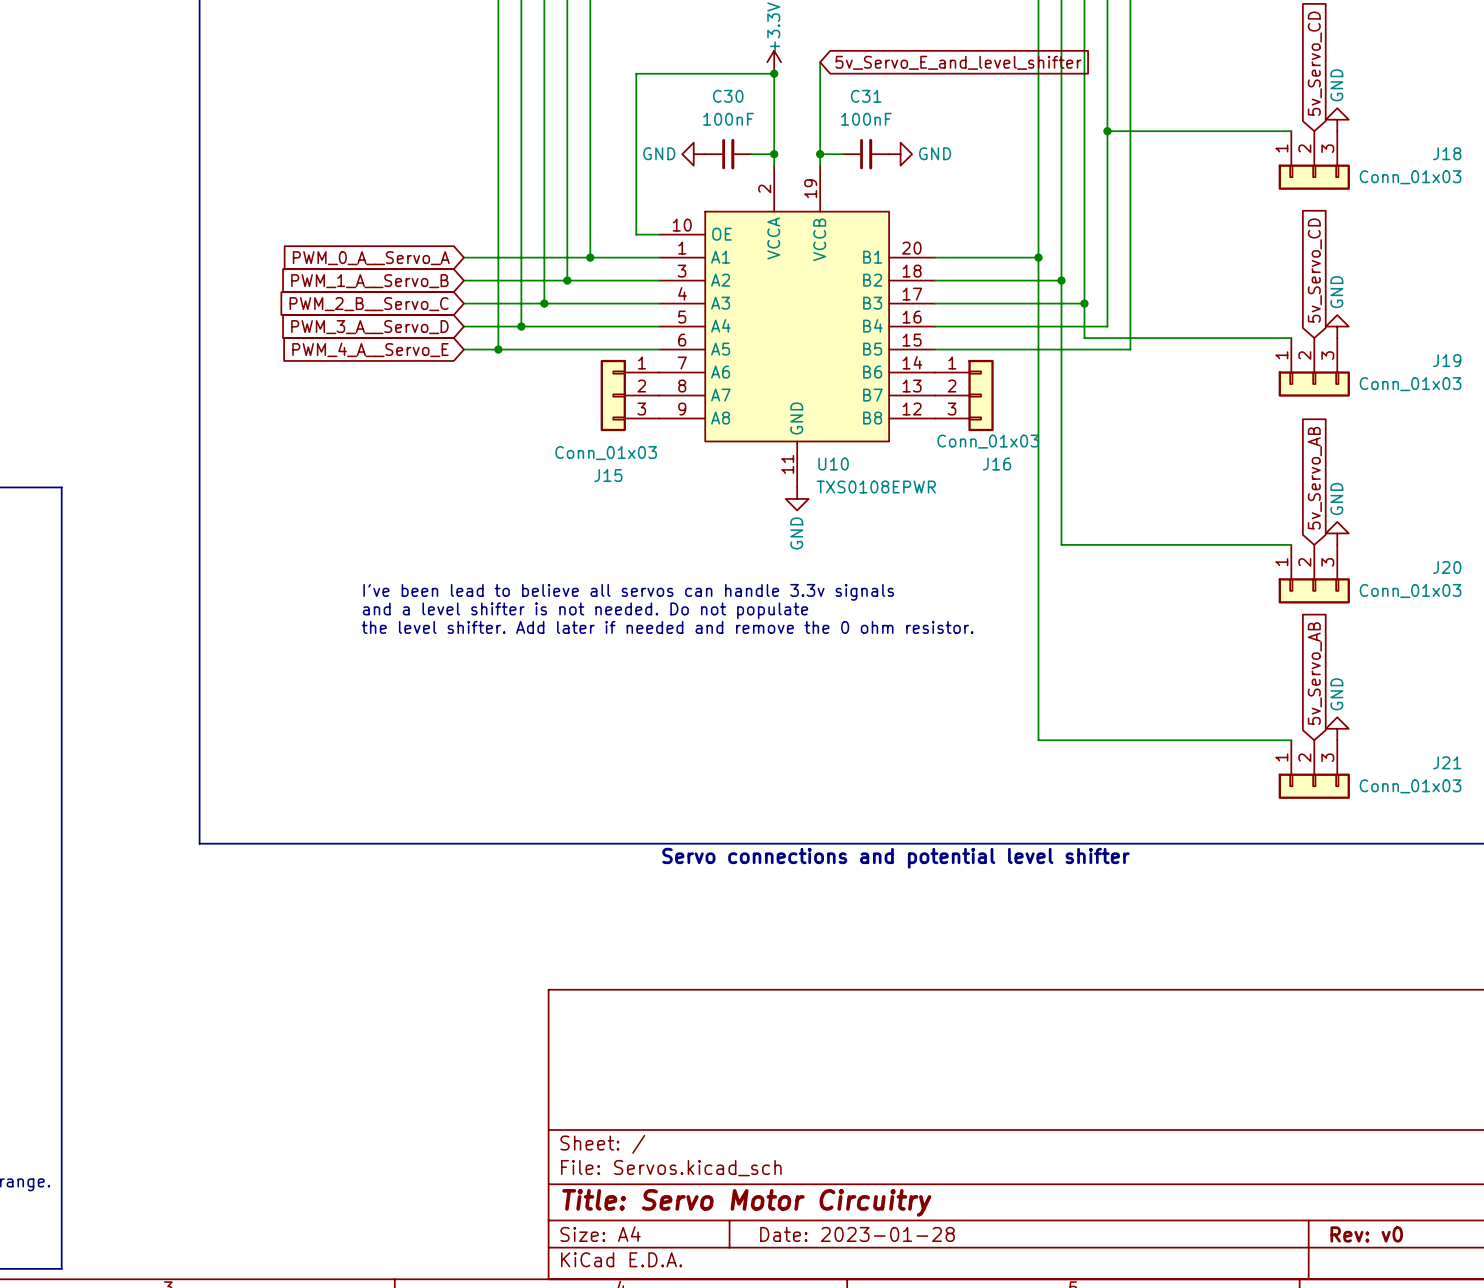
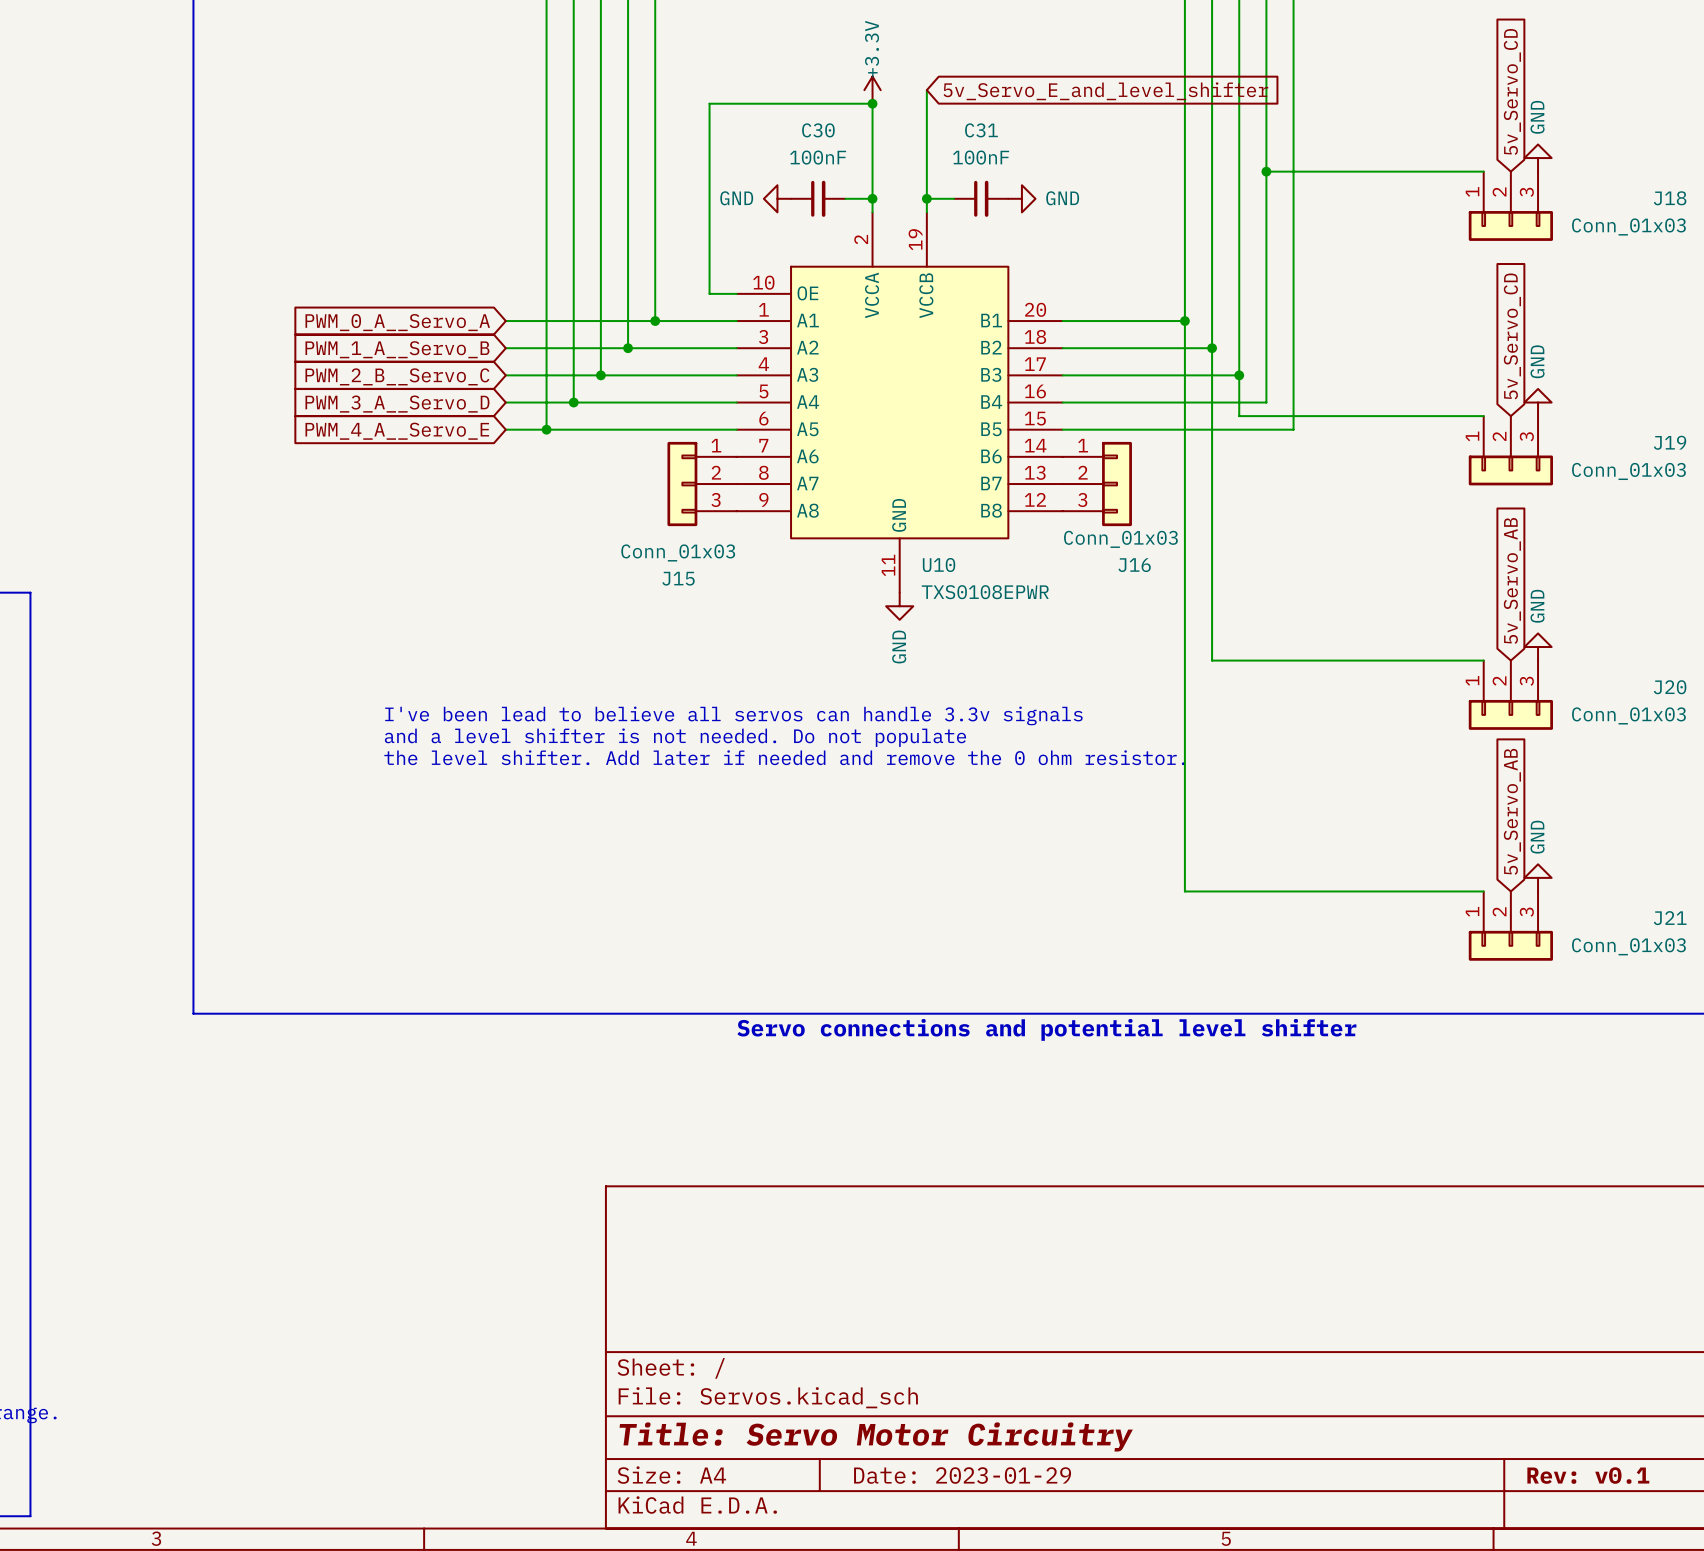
title block: Date: 2023-01-28 (857, 1234) -> Date: 2023-01-29 (962, 1475)
title block: Rev: v0 (1366, 1234) -> Rev: v0.1 (1588, 1475)

